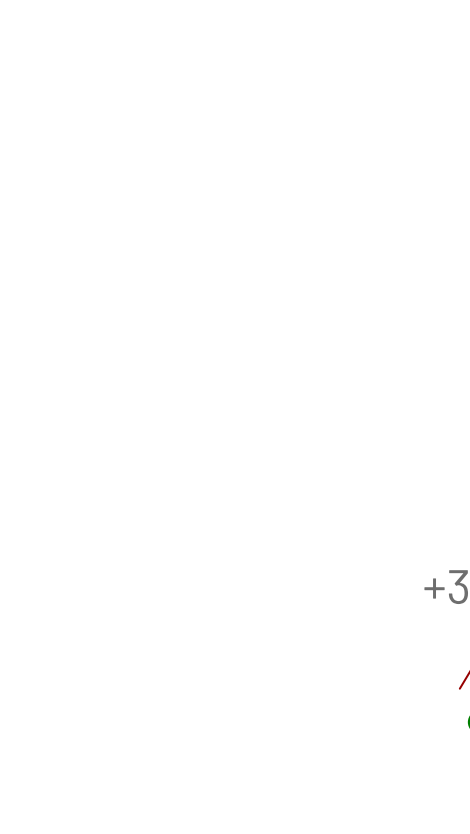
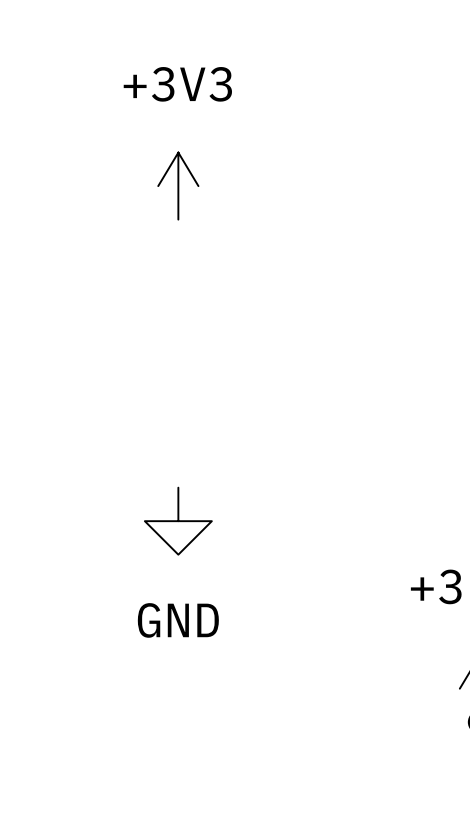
power symbol: none -> +3V3 (178, 186)
power symbol: none -> GND (178, 521)

